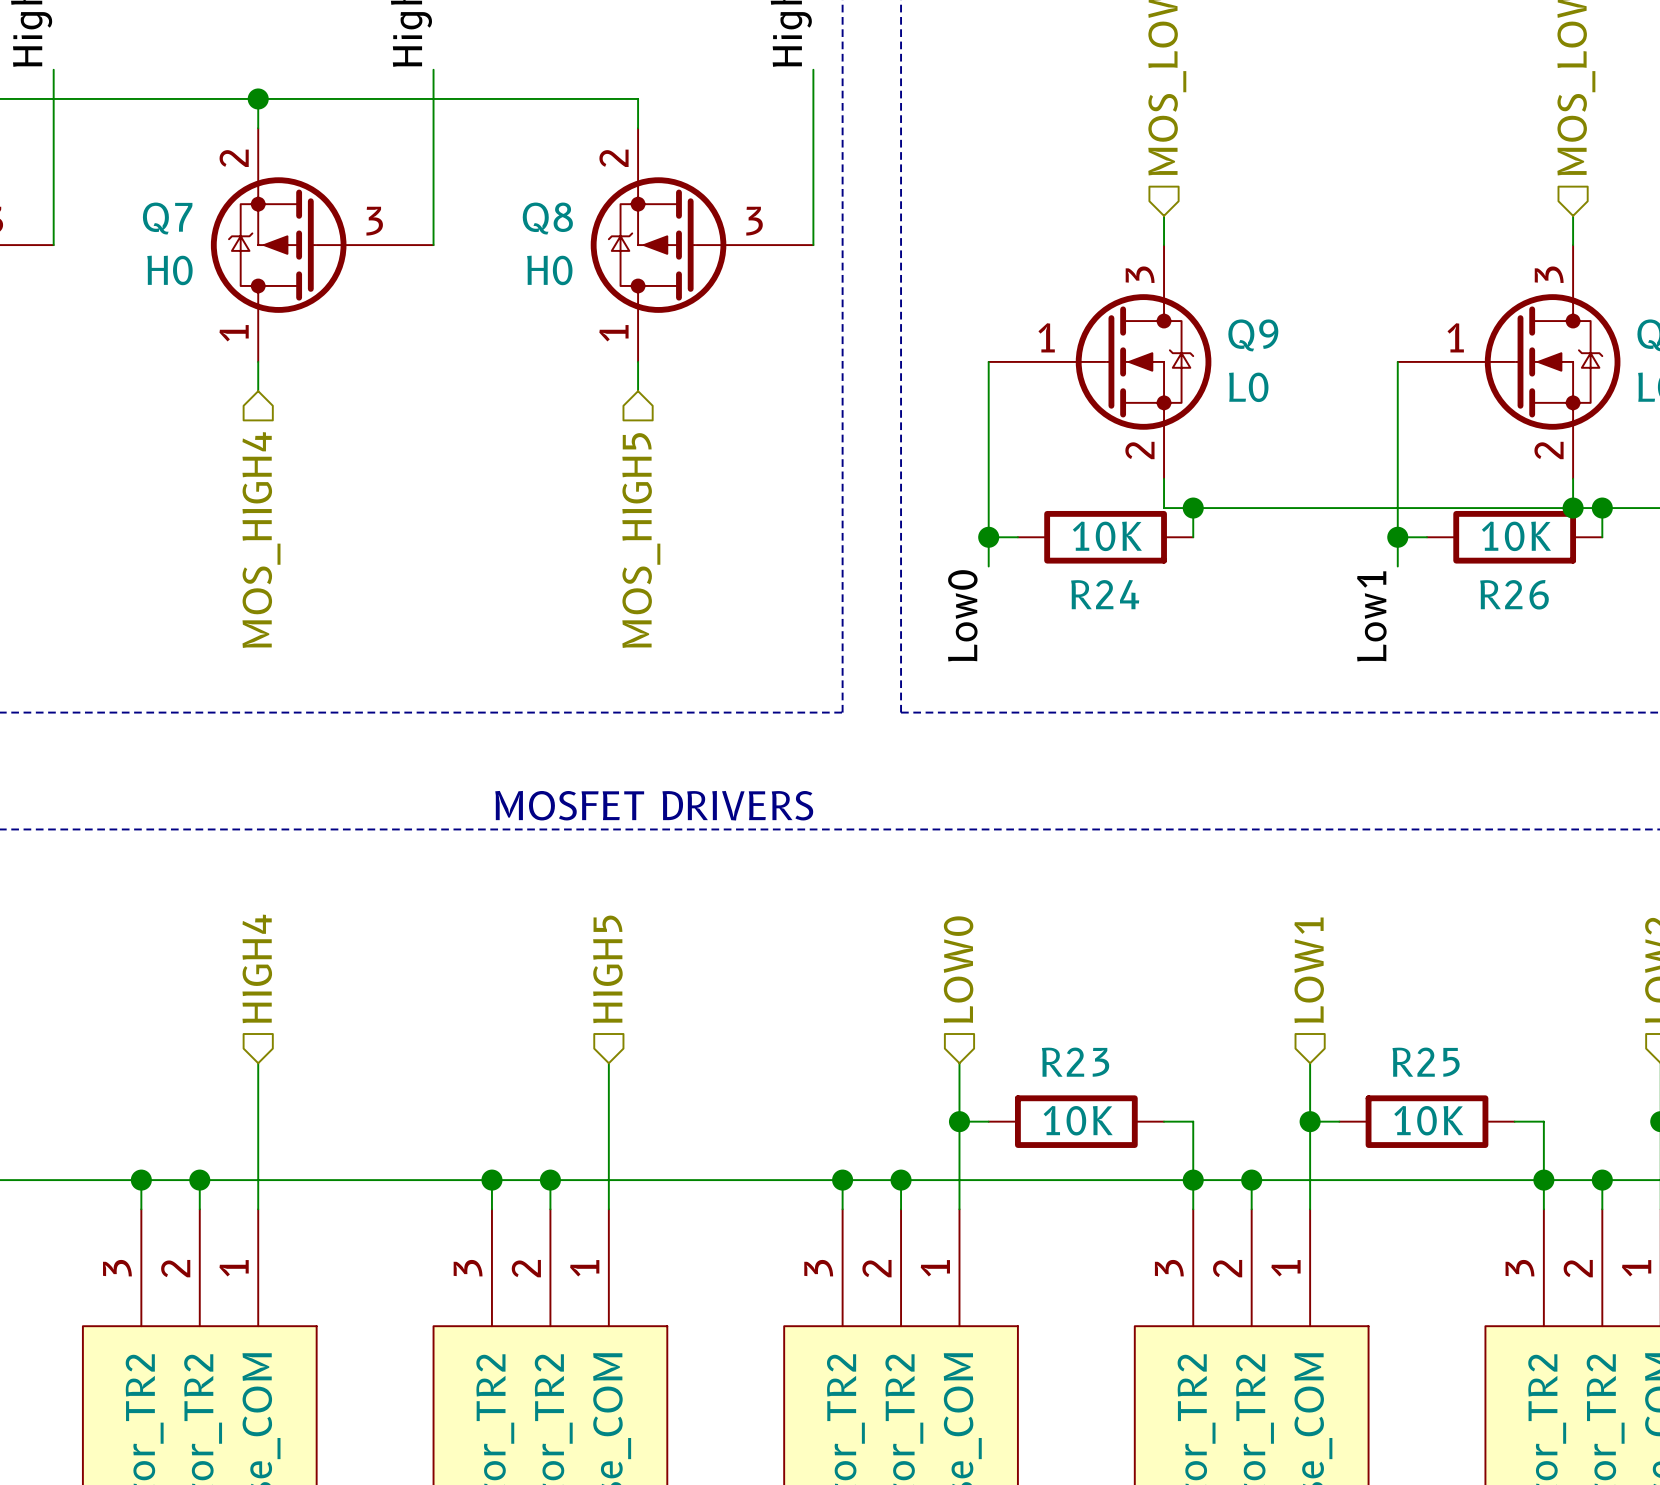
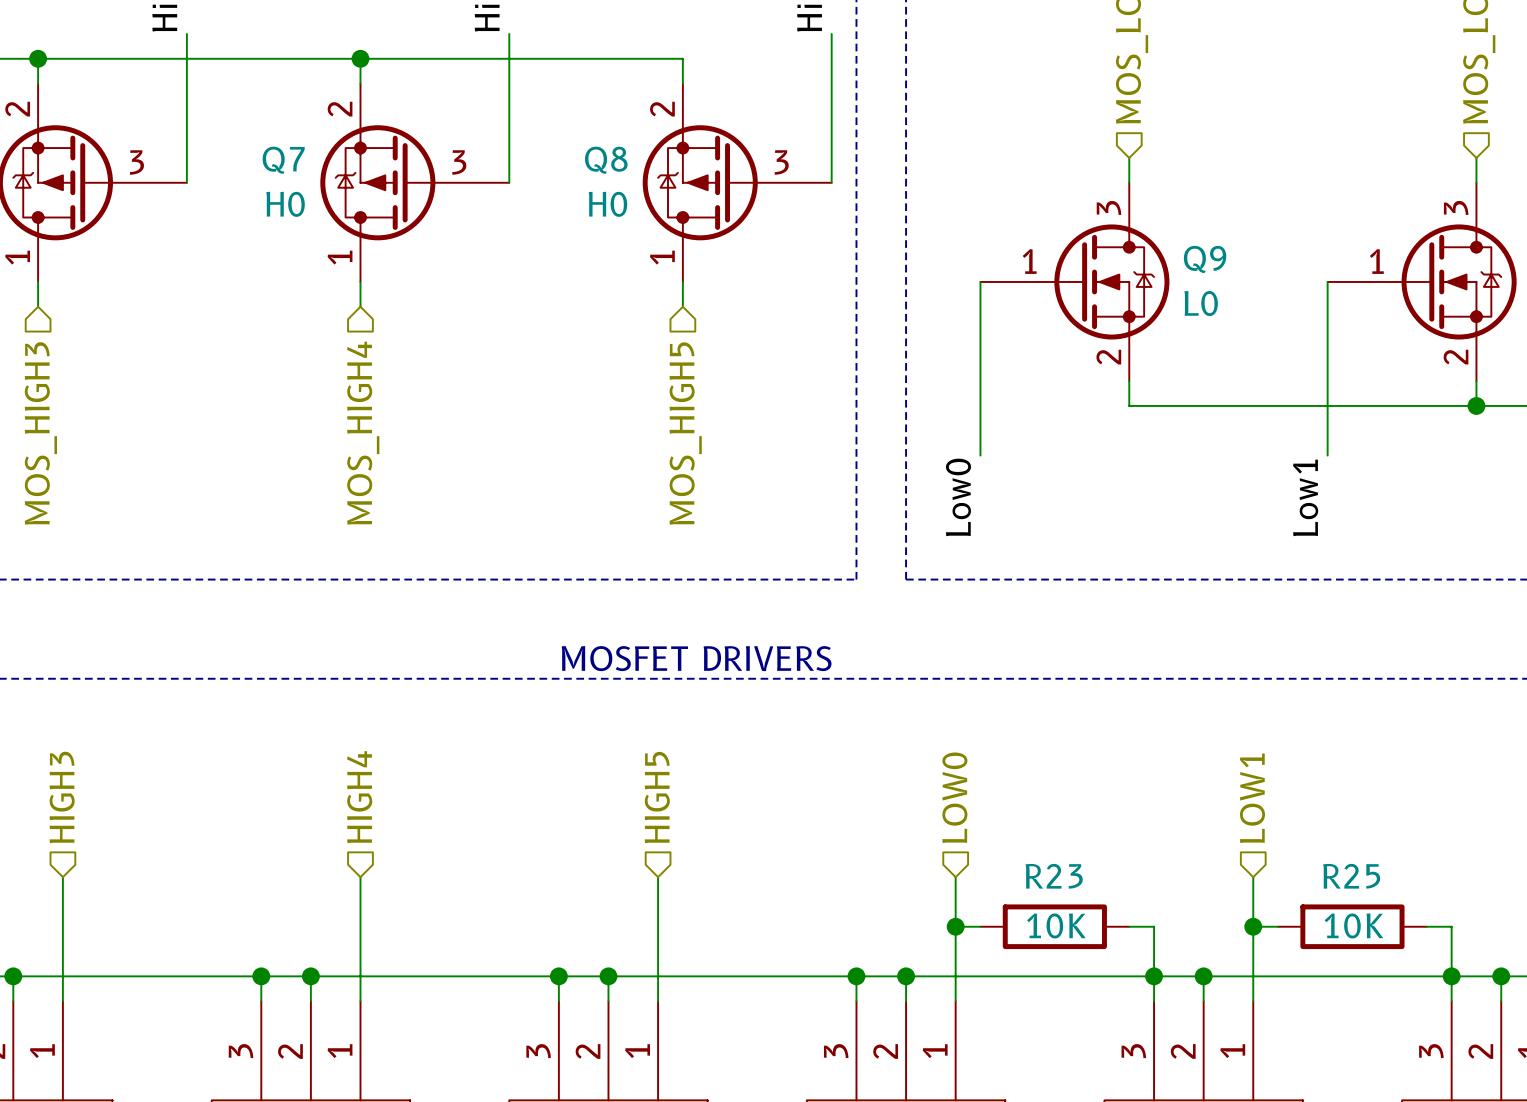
wire: (1193, 508) (1193, 537) -> none
junction: (1193, 508) -> none
wire: (1602, 508) (1602, 537) -> none
junction: (1602, 508) -> none
wire: (988, 537) (1017, 537) -> none
junction: (988, 537) -> none
R24: 10K (1105, 537) -> none
wire: (1397, 537) (1426, 537) -> none
junction: (1397, 537) -> none
R26: 10K (1514, 537) -> none

